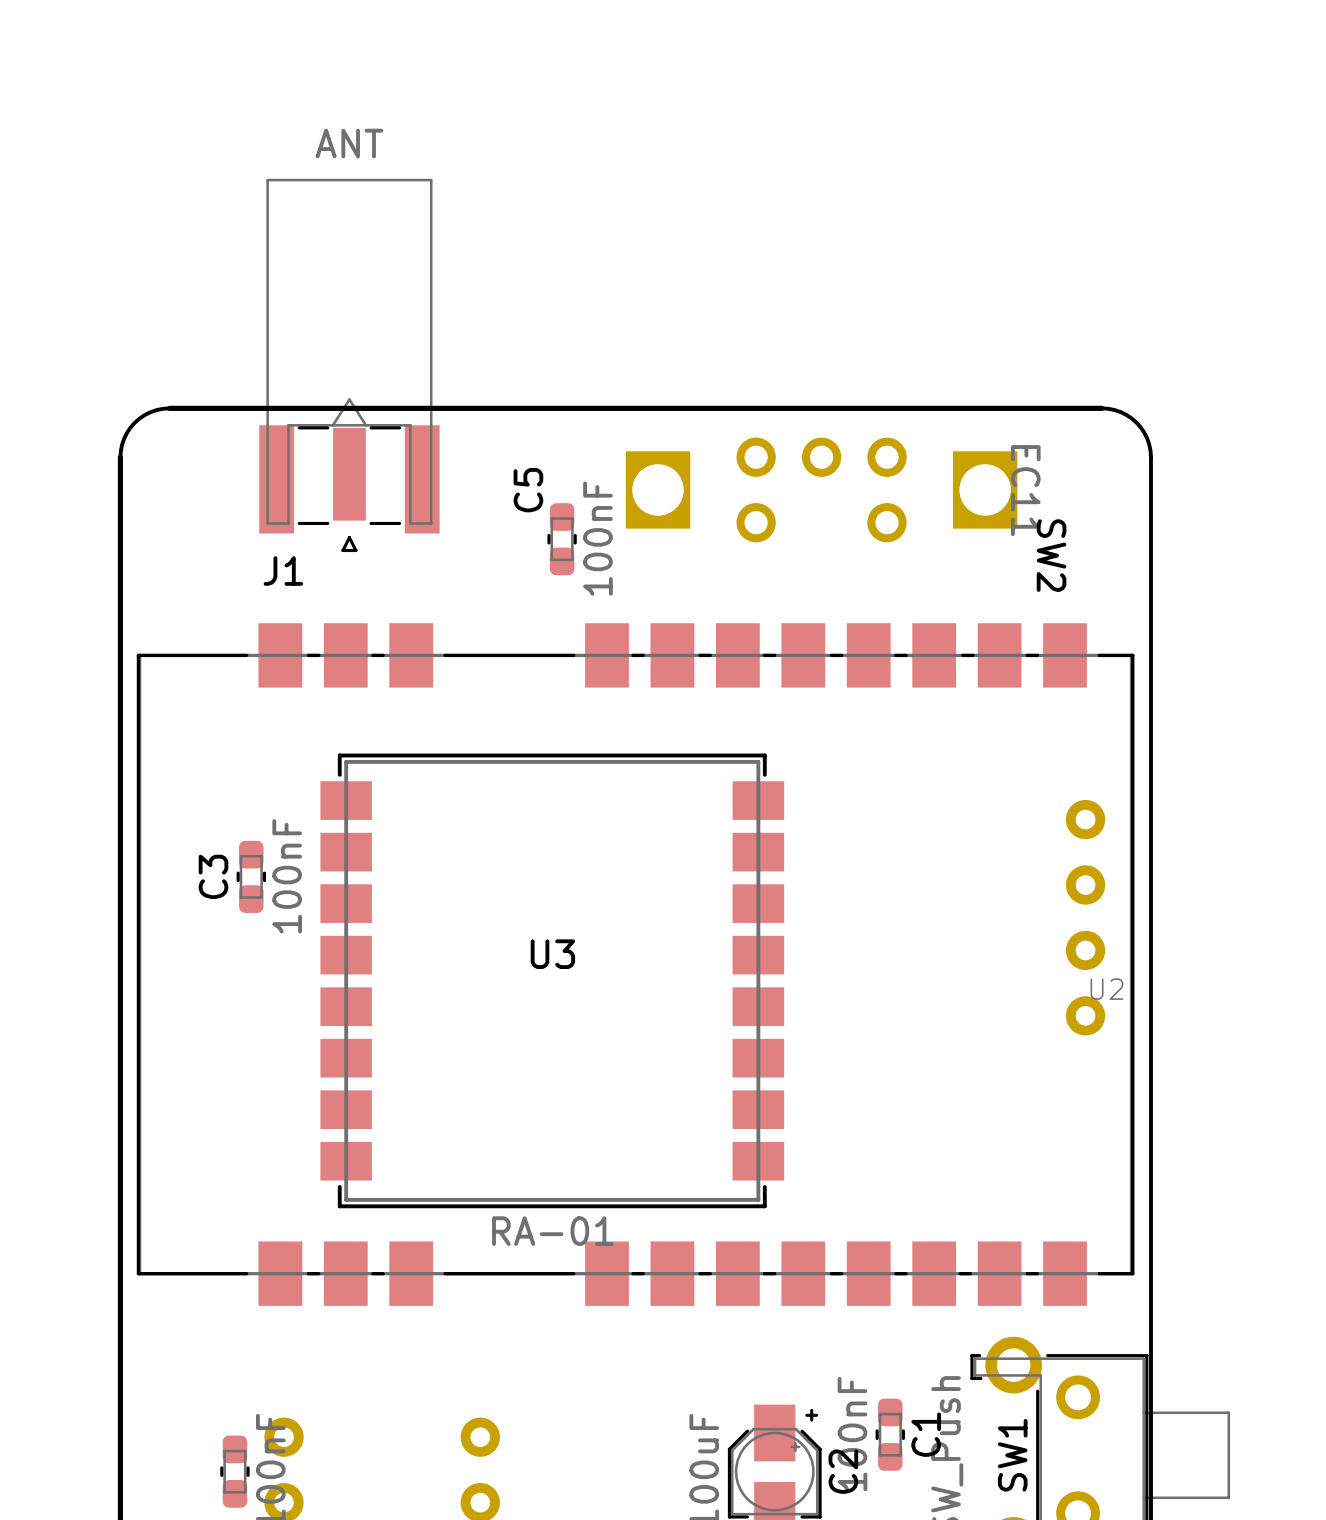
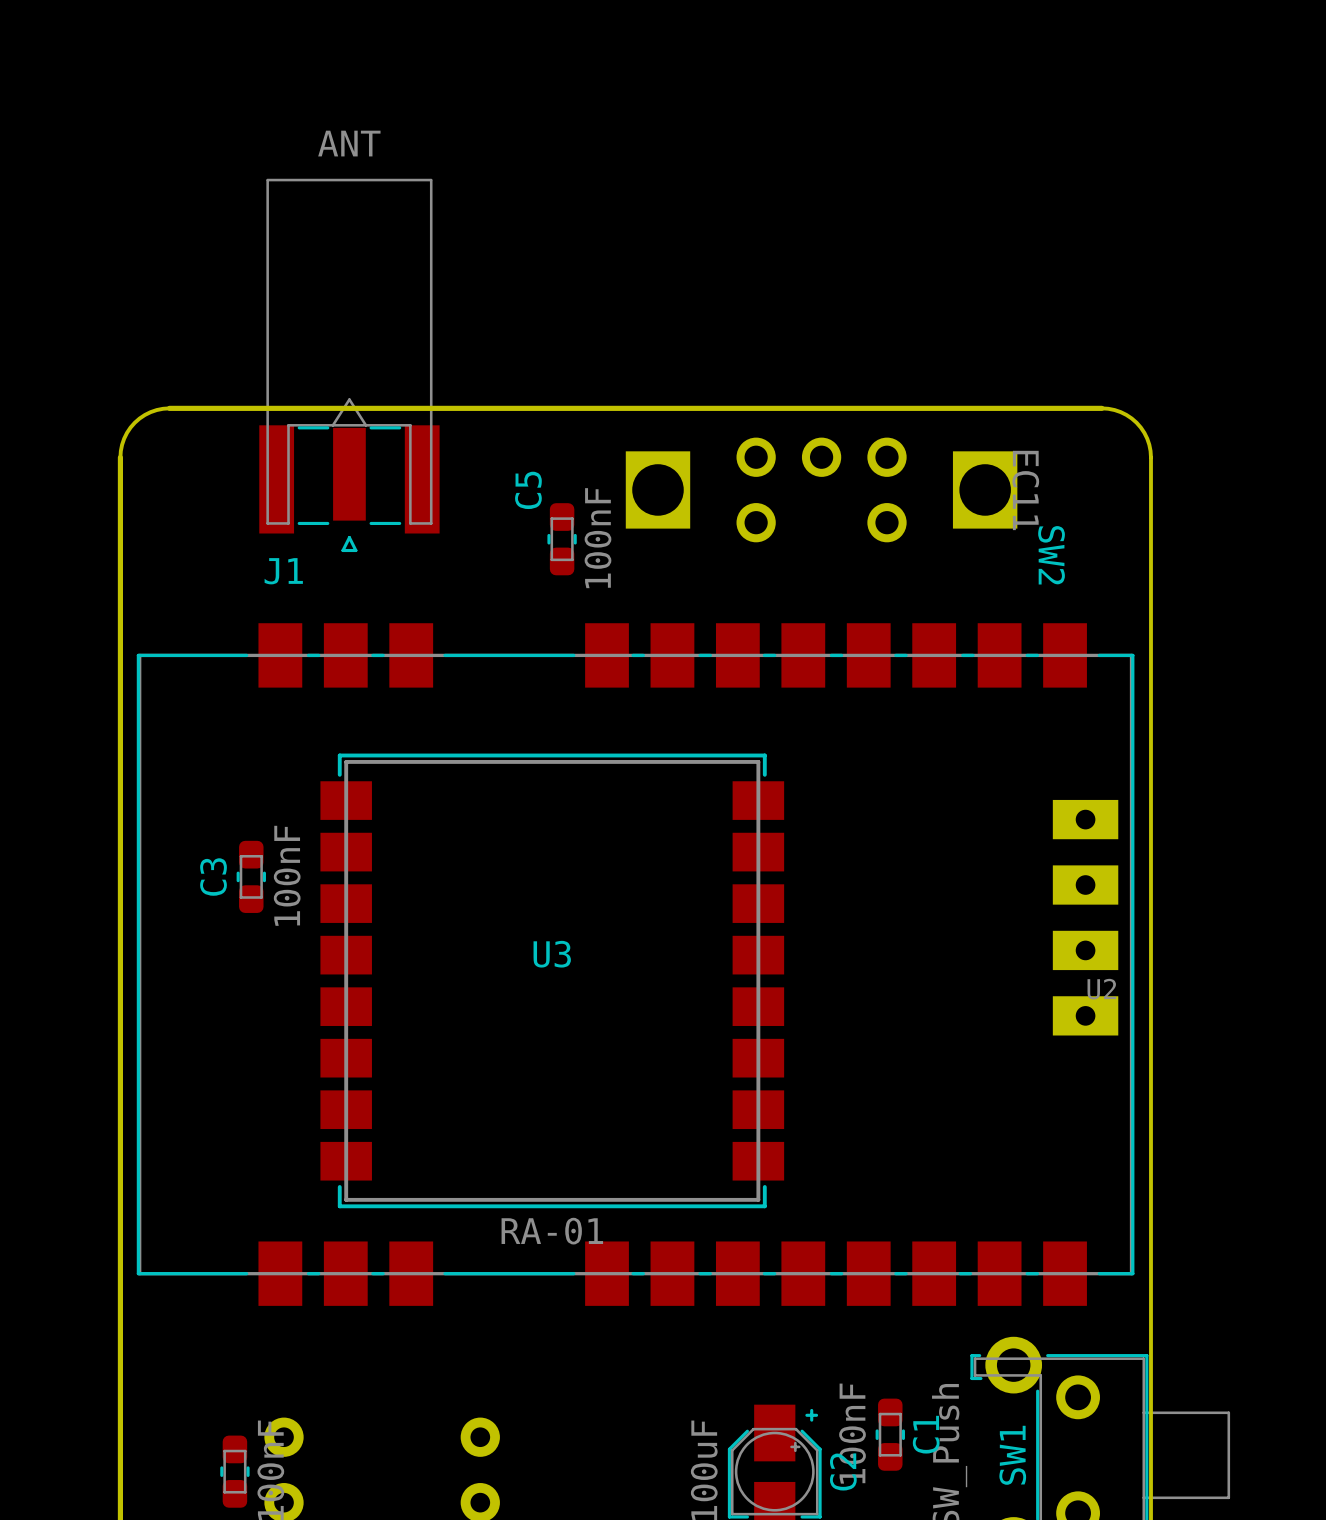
part footprint: [1065, 799, 1106, 1036] -> [1052, 799, 1119, 1036]

